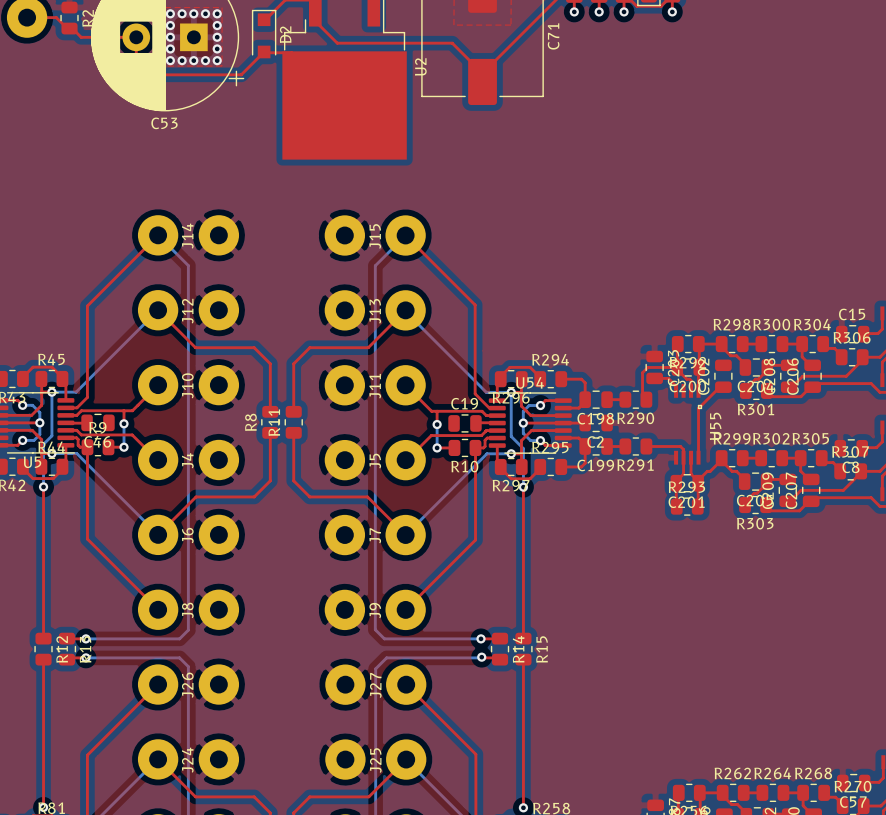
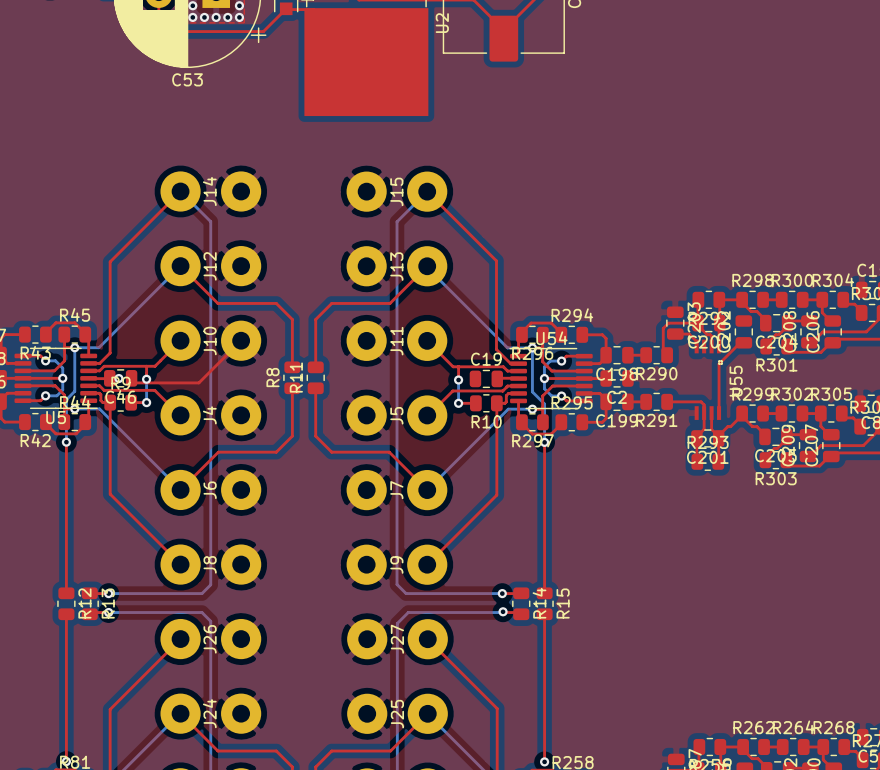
top track: none -> (241, 340) (198, 382) (134, 382) (131, 378)
via: none -> (118, 378)

